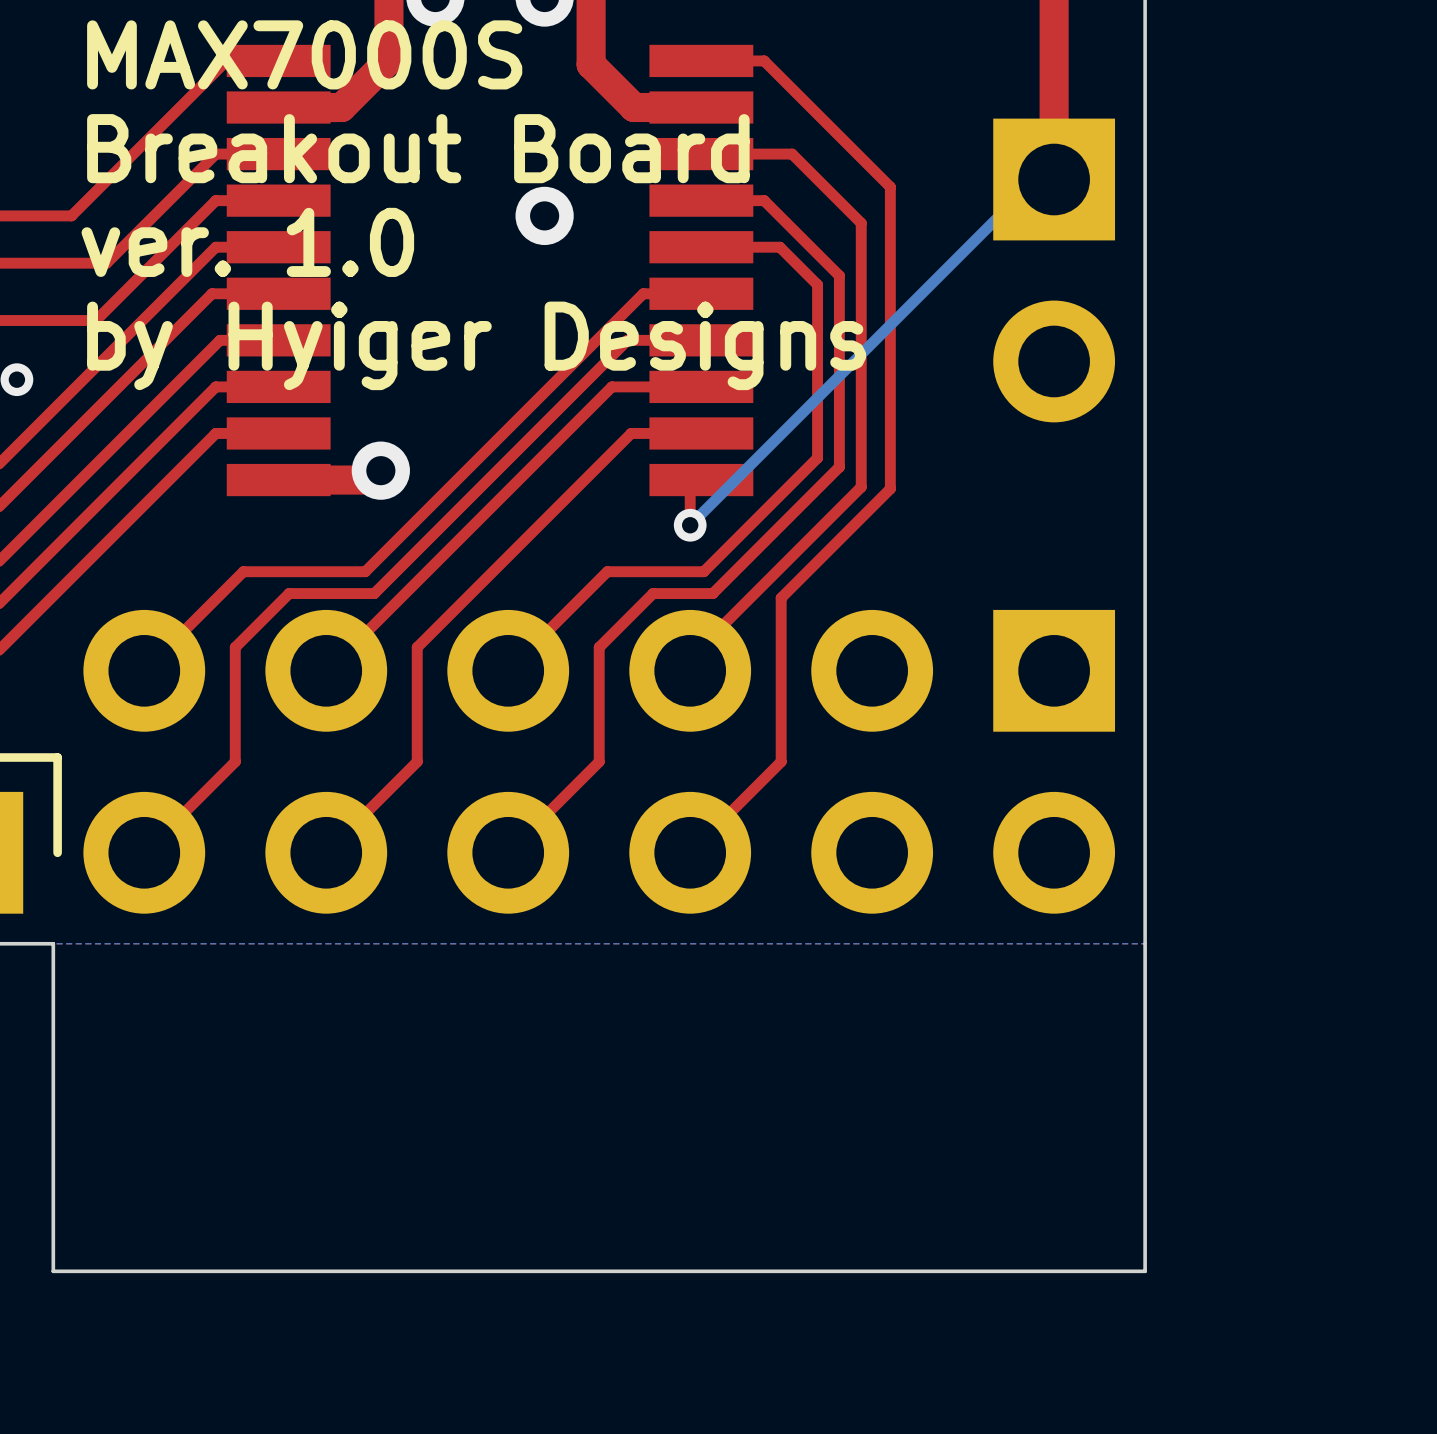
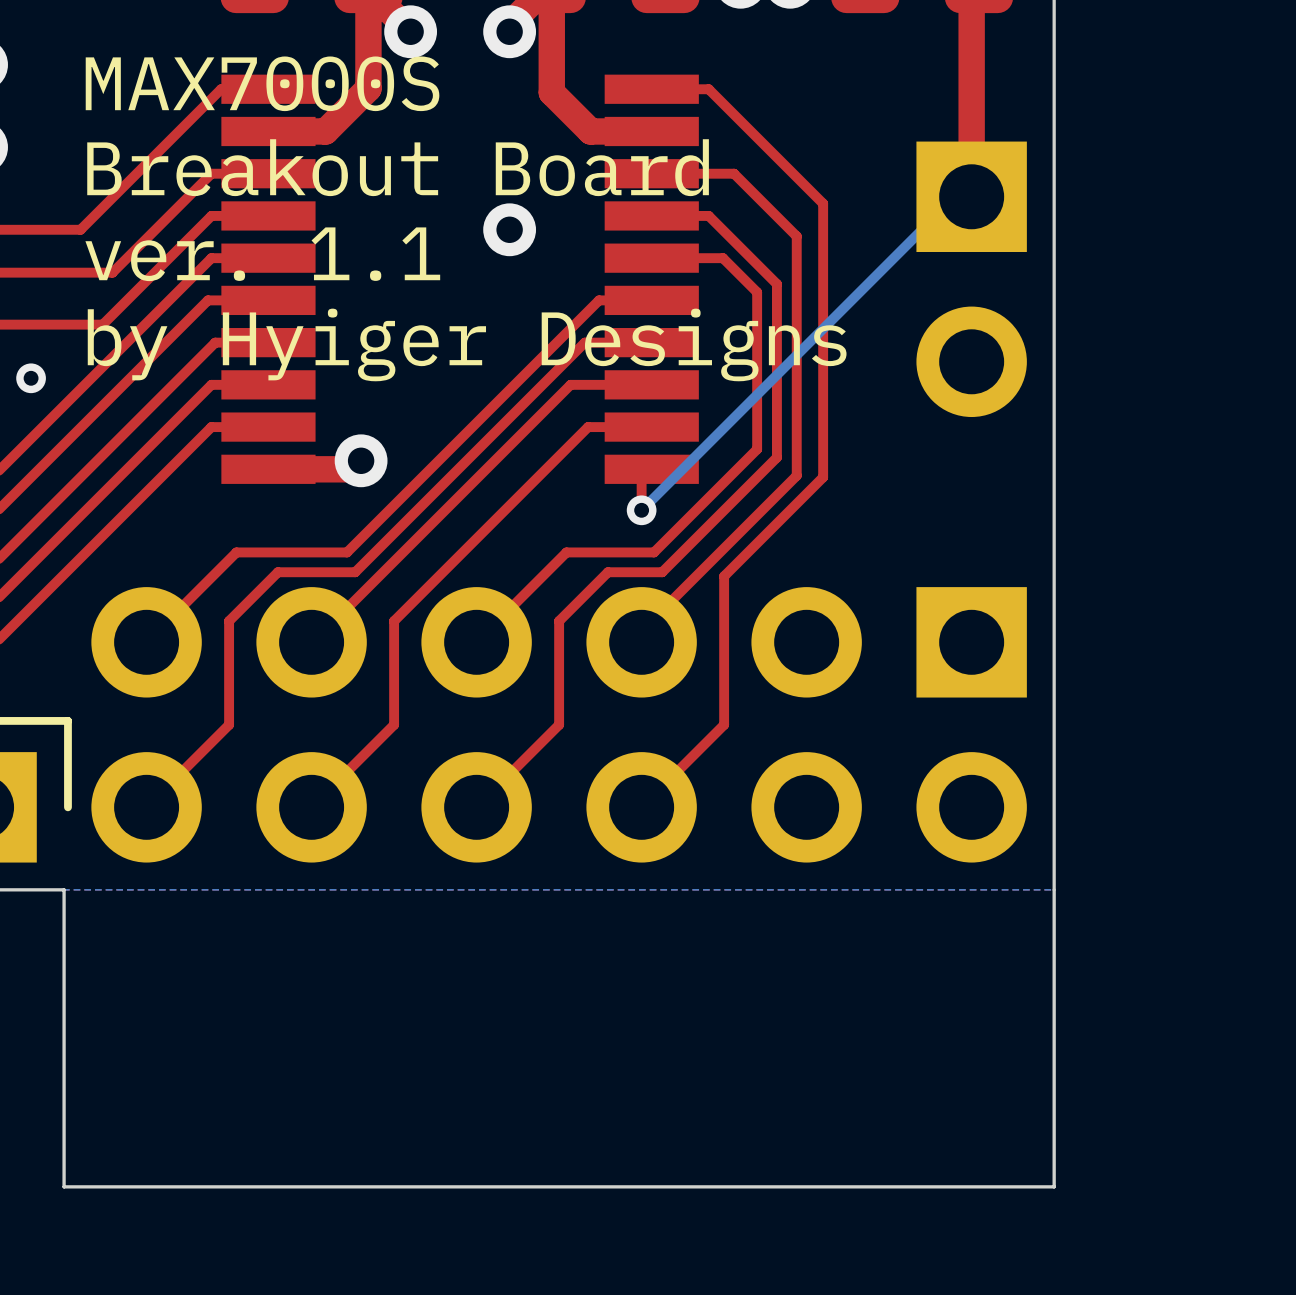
text: ver. 1.0 (247, 242) -> ver. 1.1 (262, 254)

